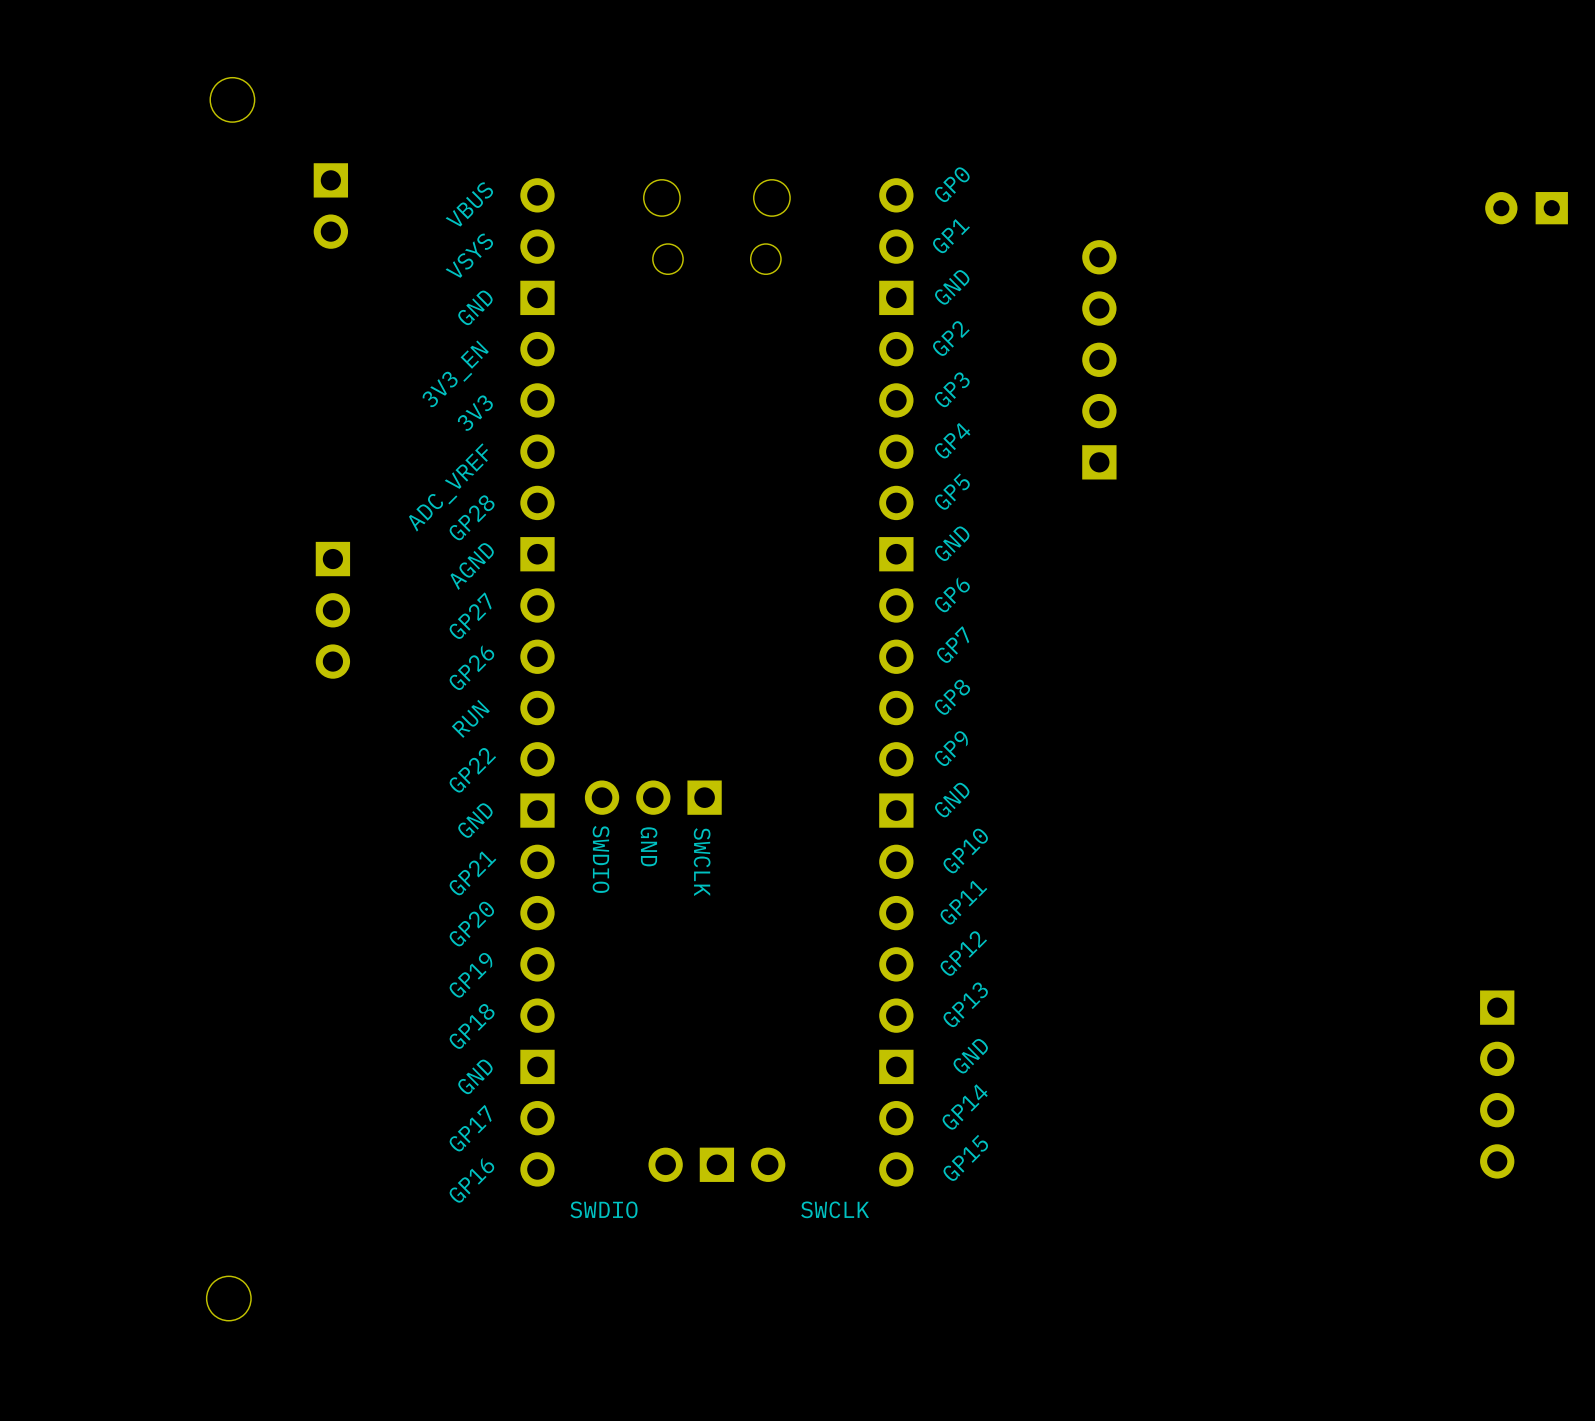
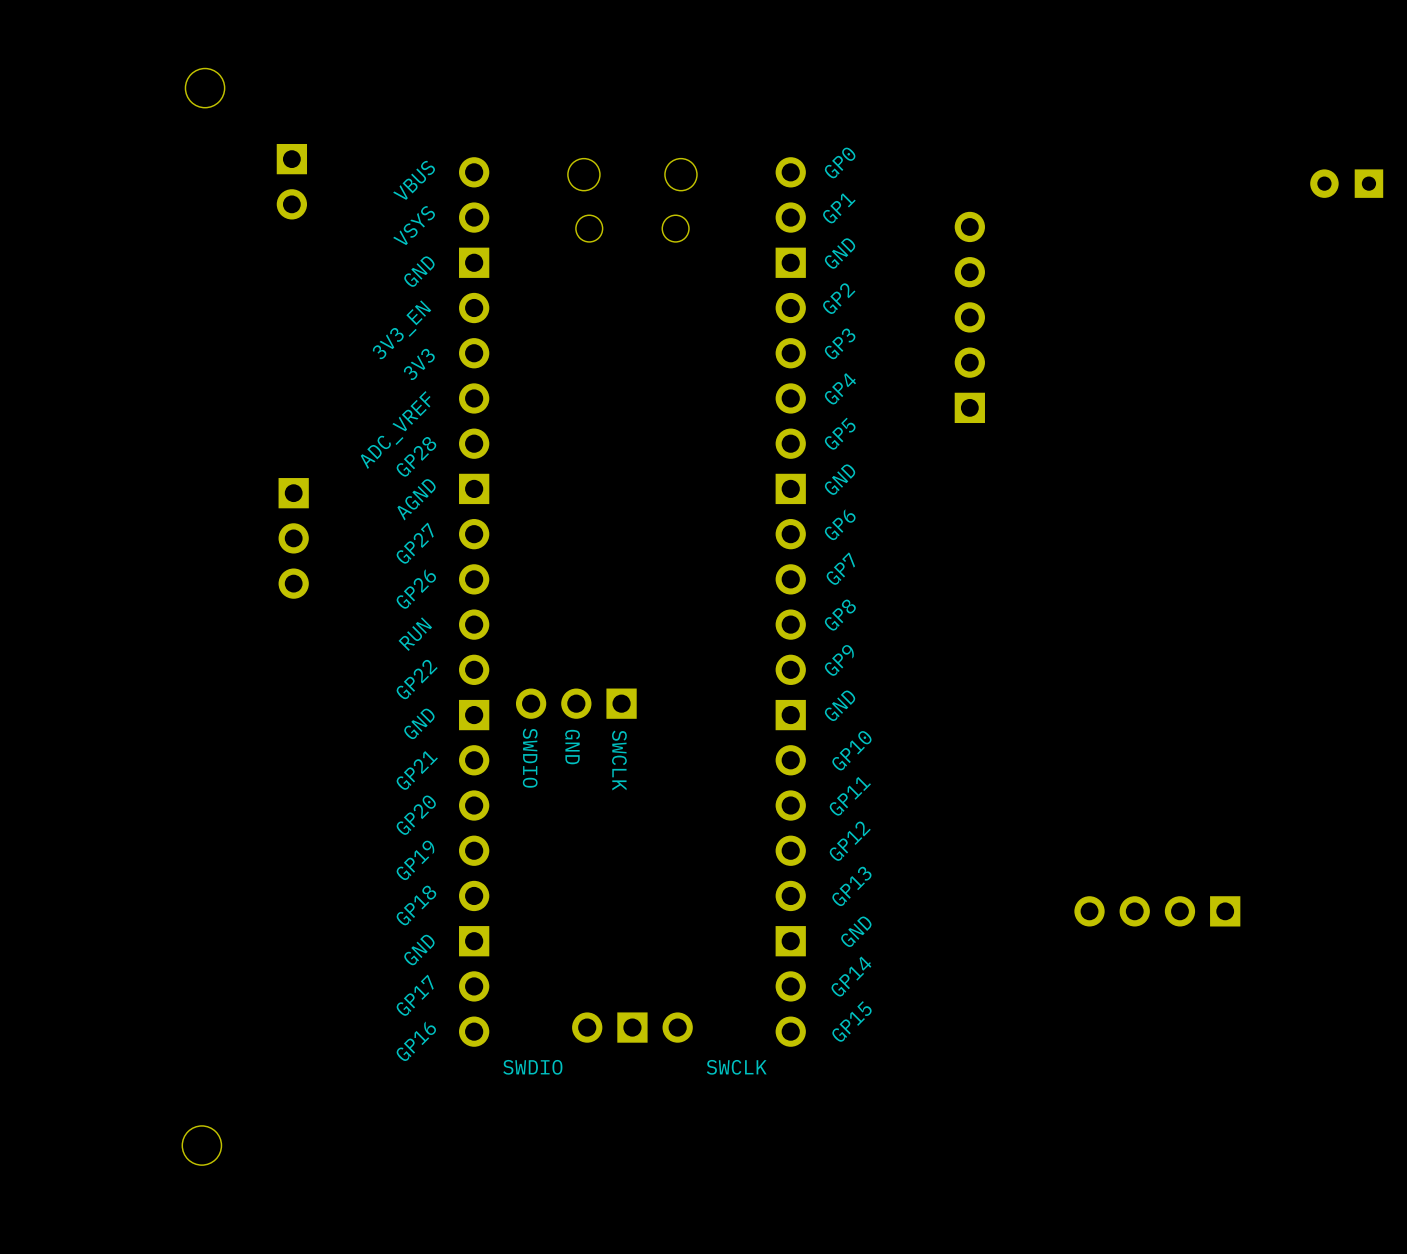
part rotation: 0° (1497, 1084) -> 90° clockwise (1157, 911)
part position: (1497, 1084) -> (1157, 911)

